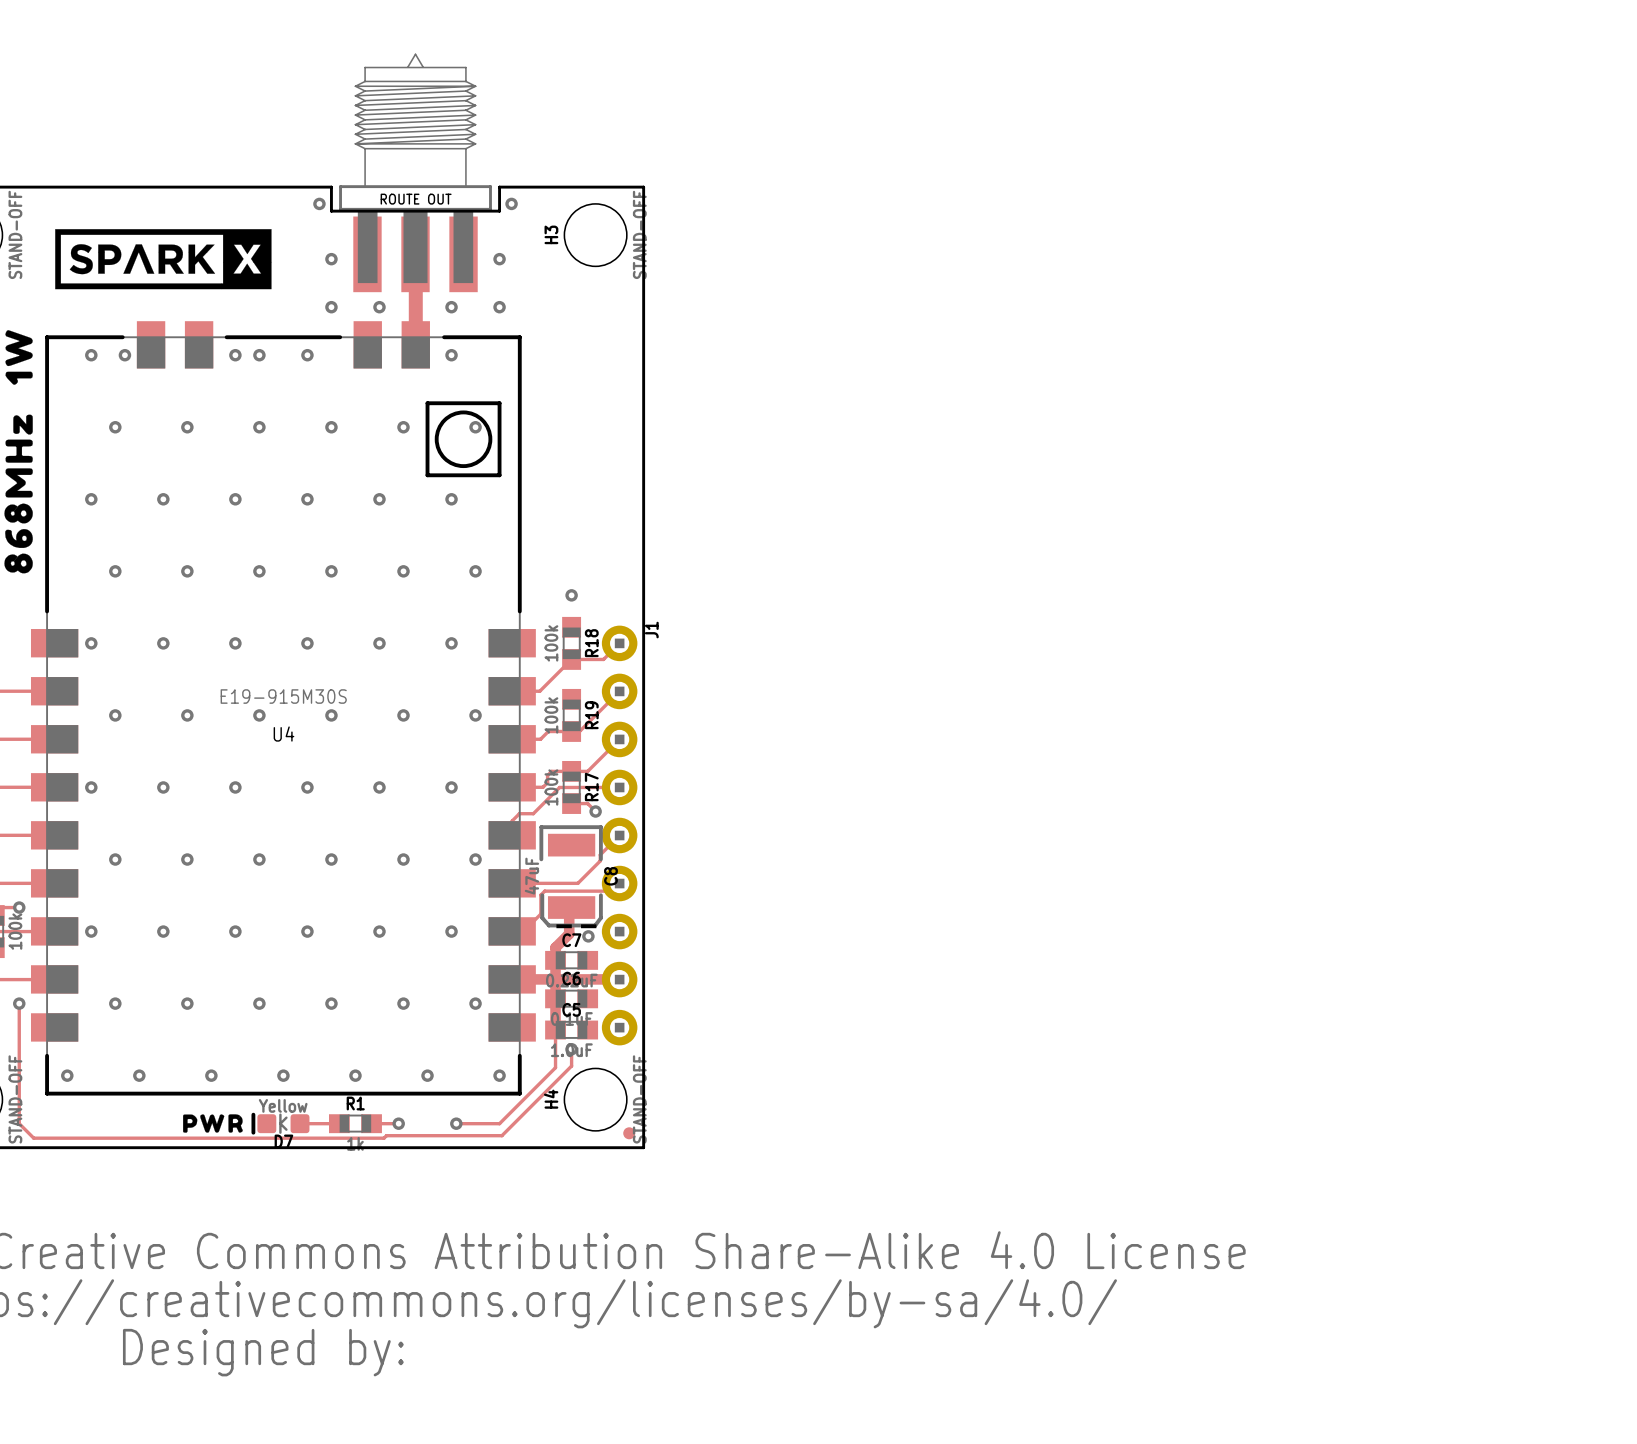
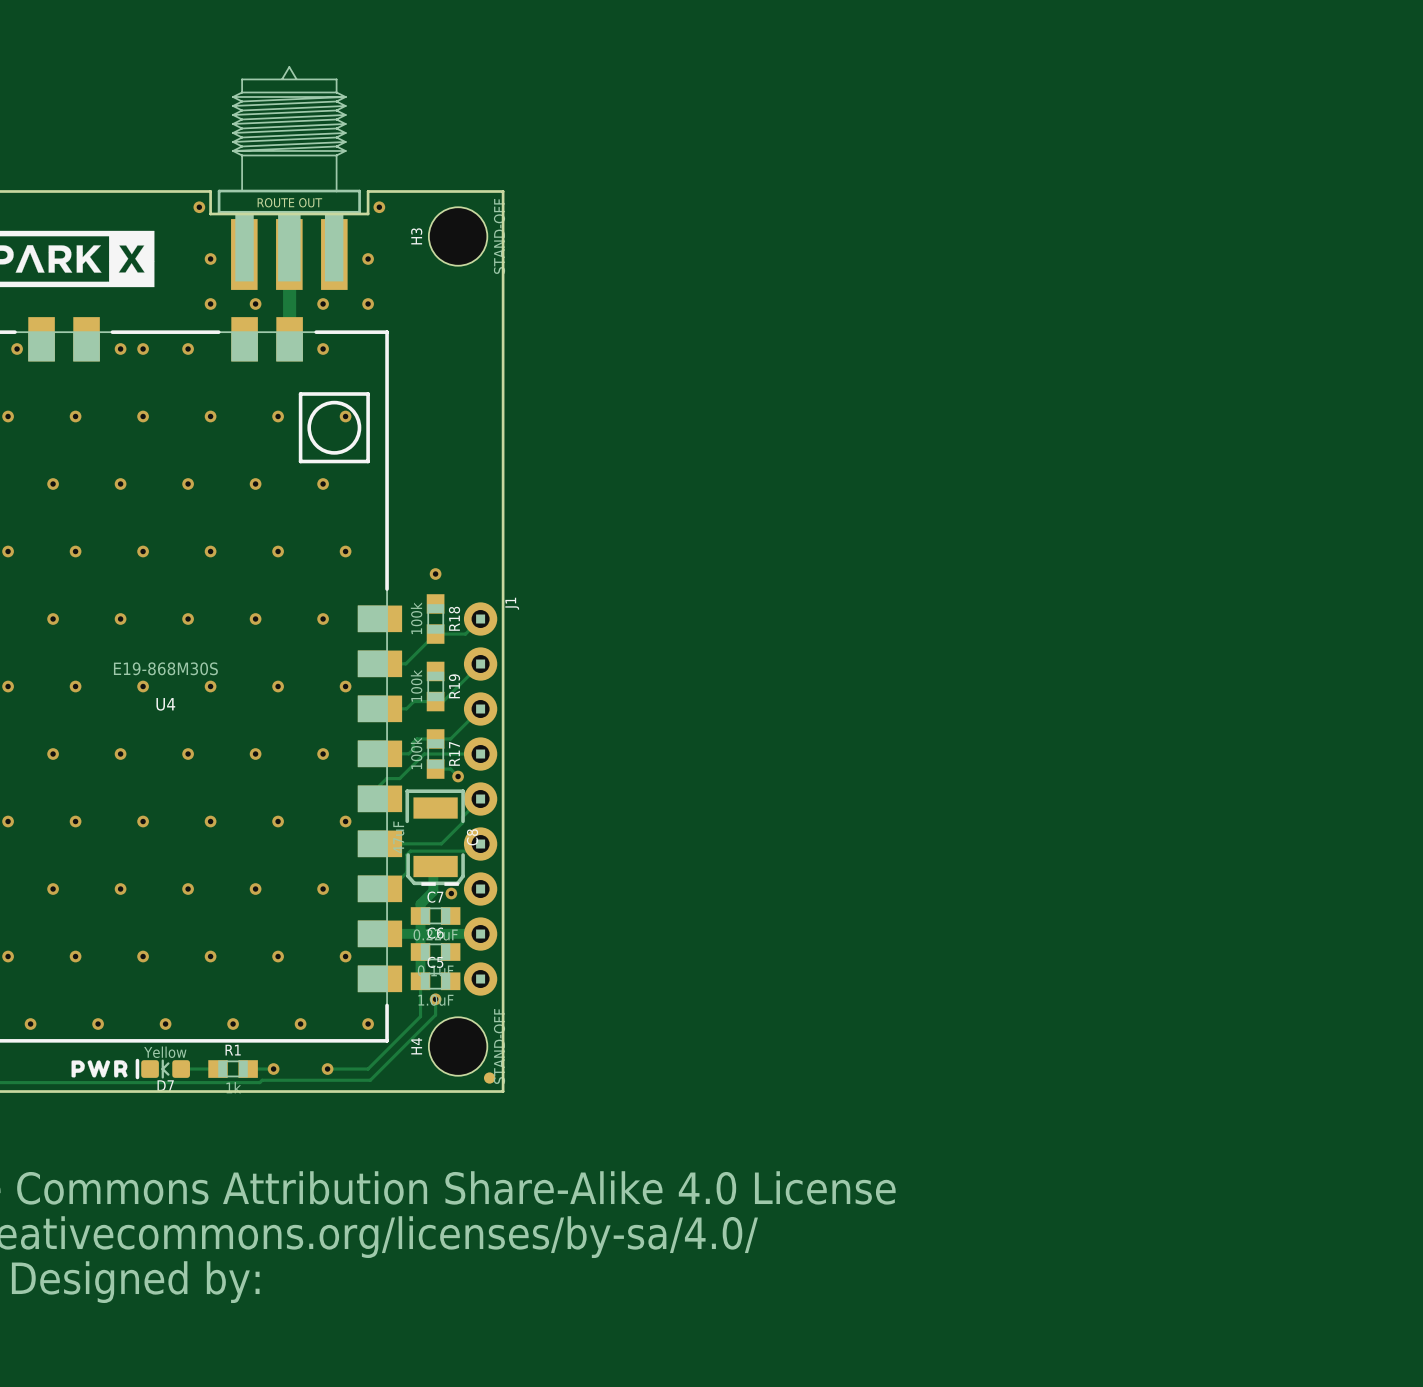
U4 value: E19-915M30S (283, 696) -> E19-868M30S (165, 668)

